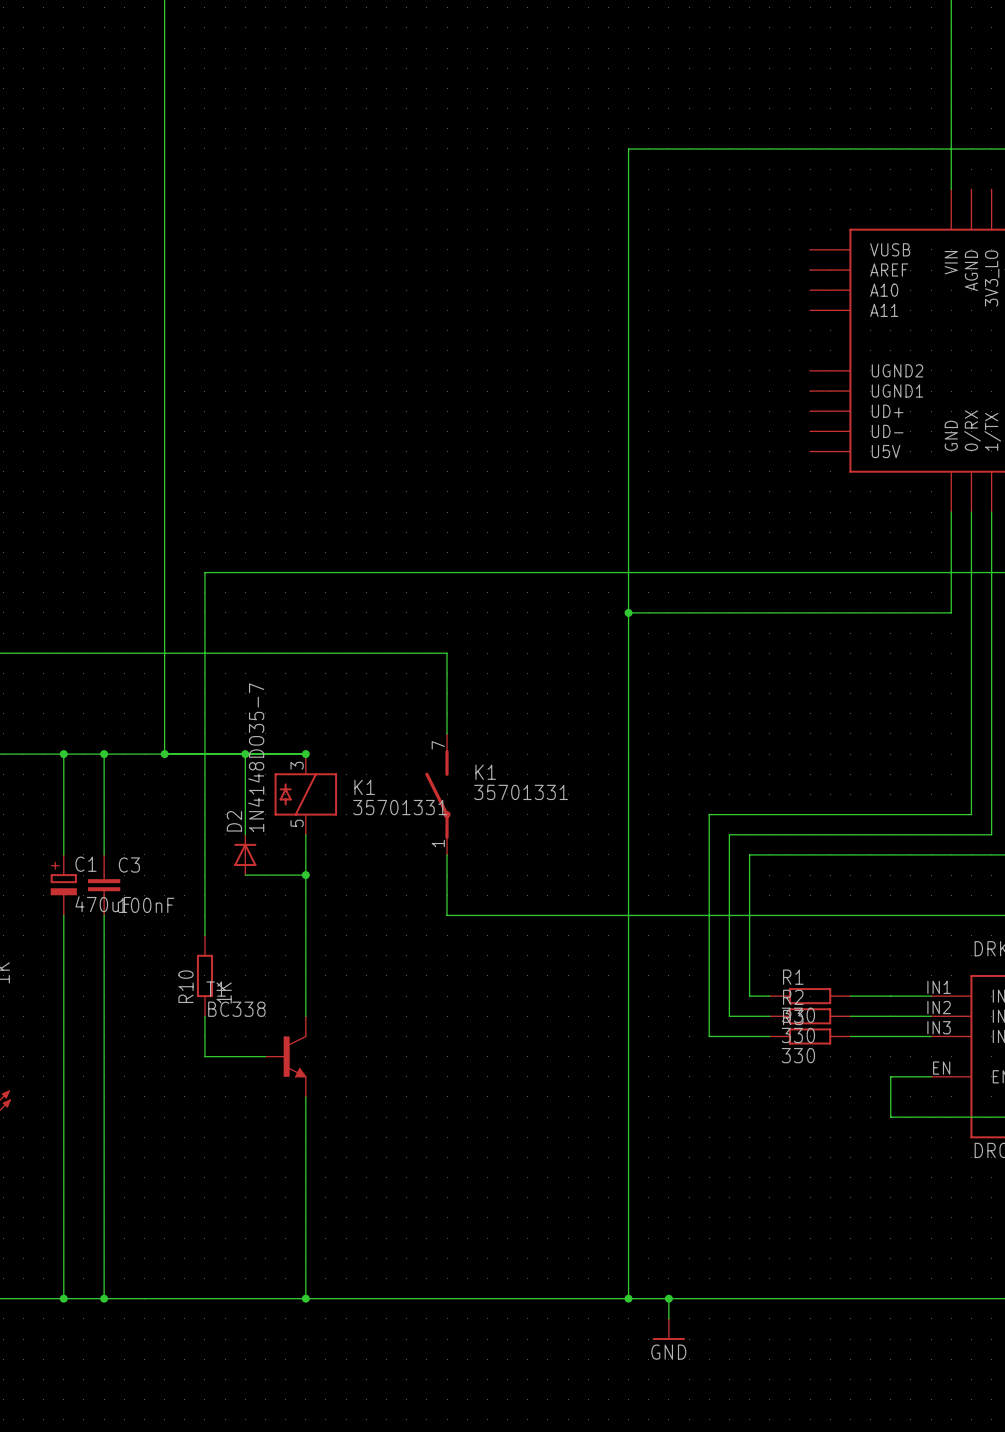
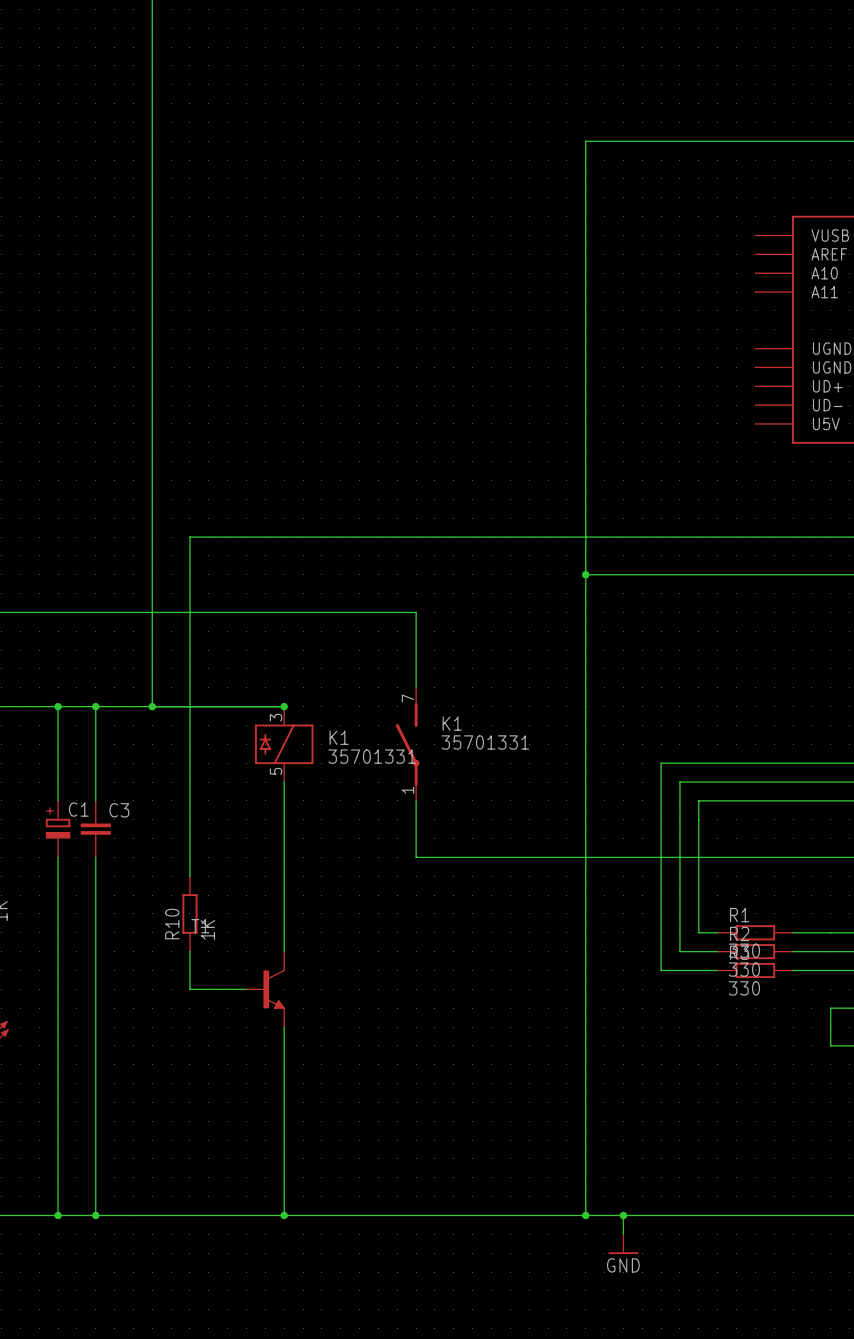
wire: (245, 754) (245, 834) -> none
junction: (245, 754) -> none
D2: 1N4148DO35-7 (245, 854) -> none
wire: (245, 875) (305, 875) -> none
junction: (305, 875) -> none
C1 value: 470uF (103, 904) -> none
C3 value: 100nF (146, 905) -> none
T1 value: BC338 (236, 1009) -> none

